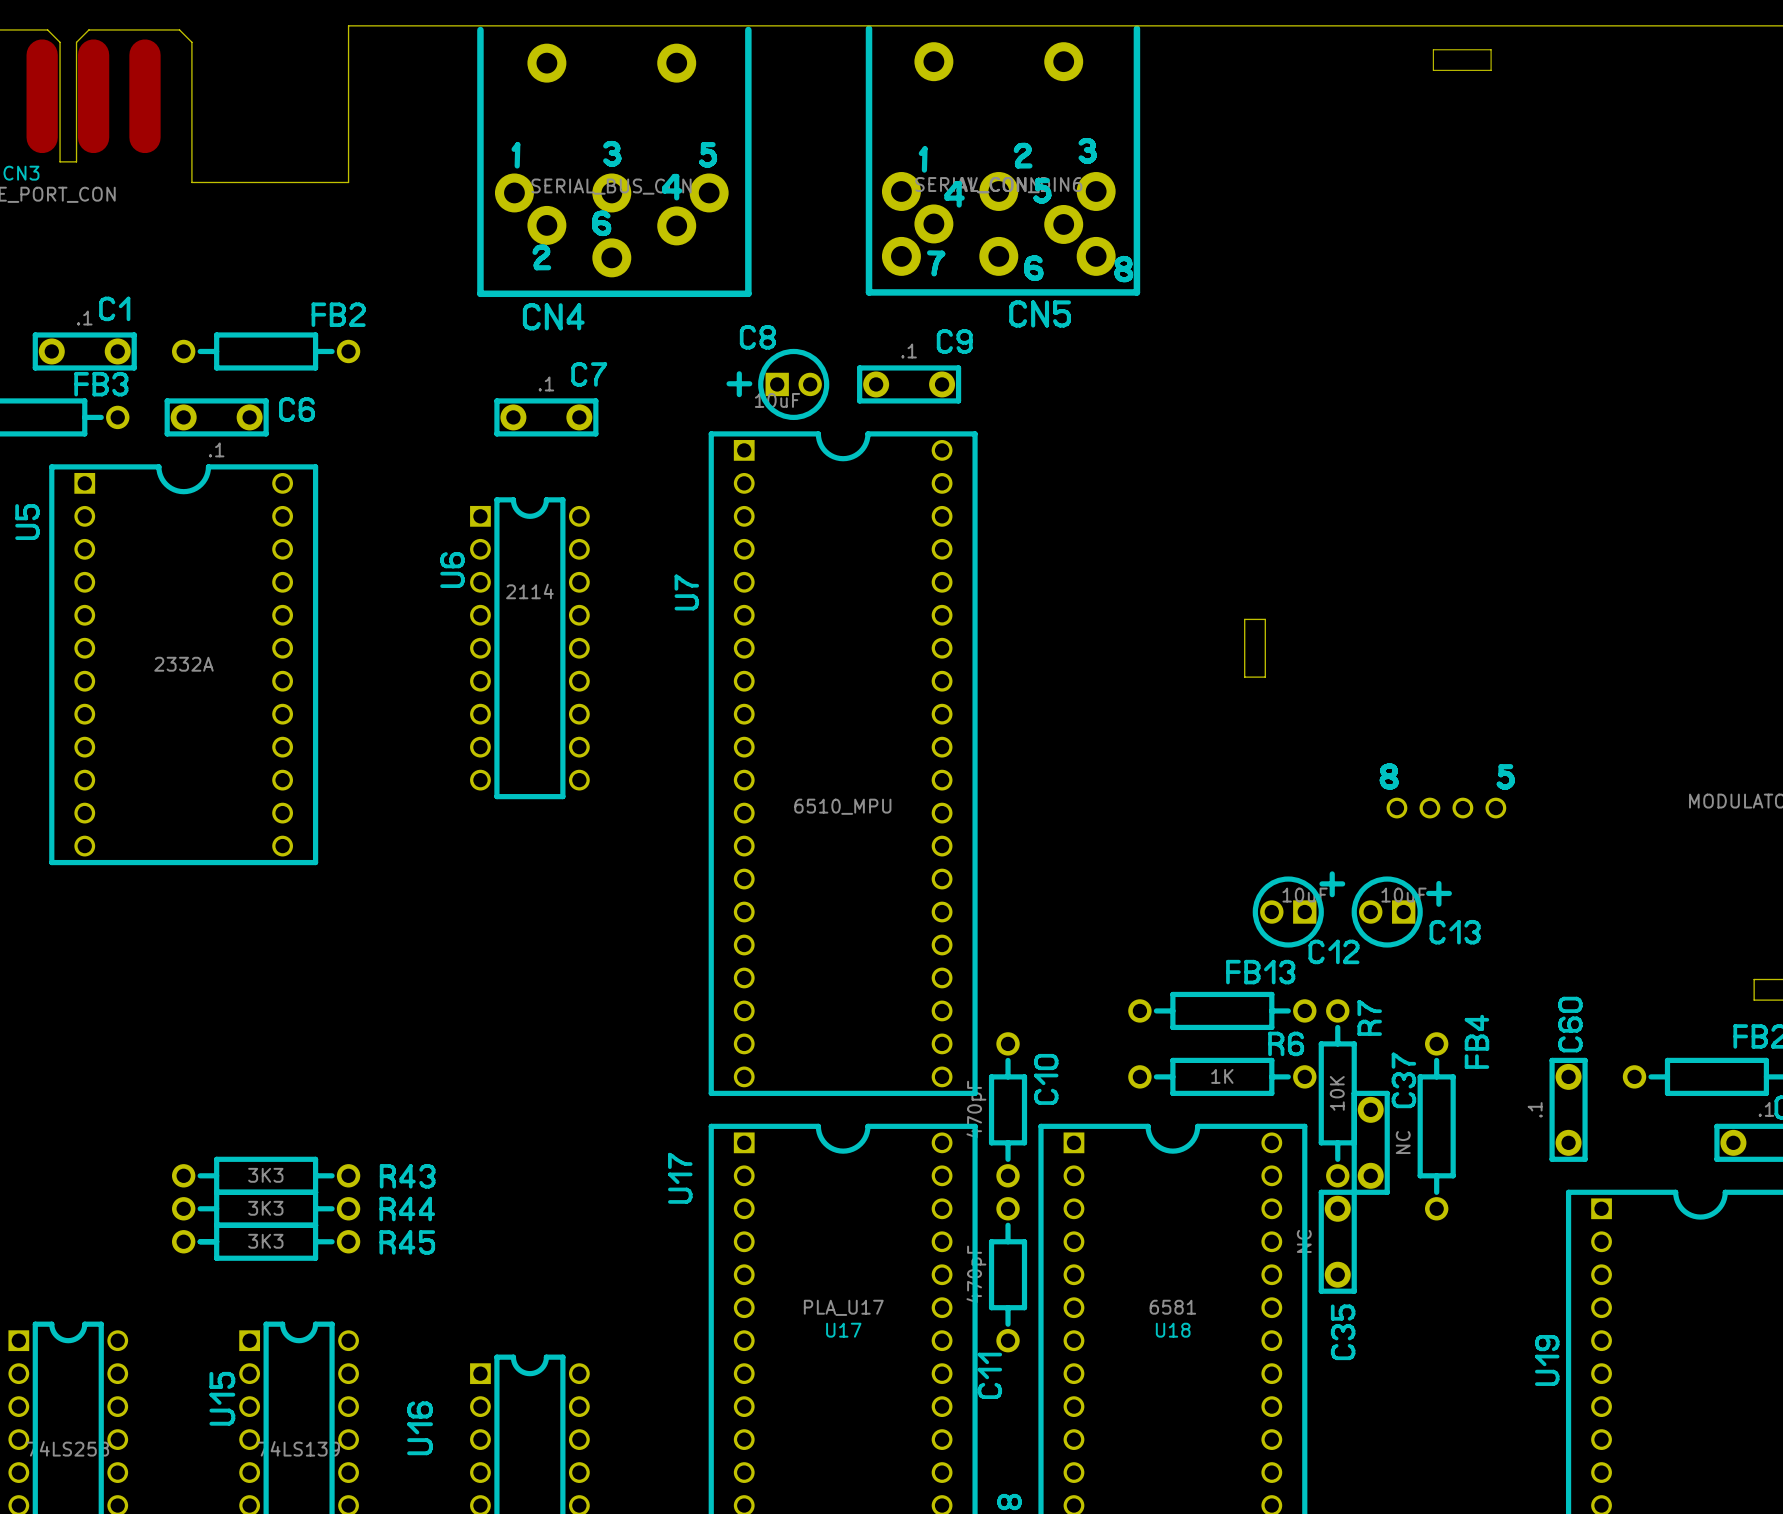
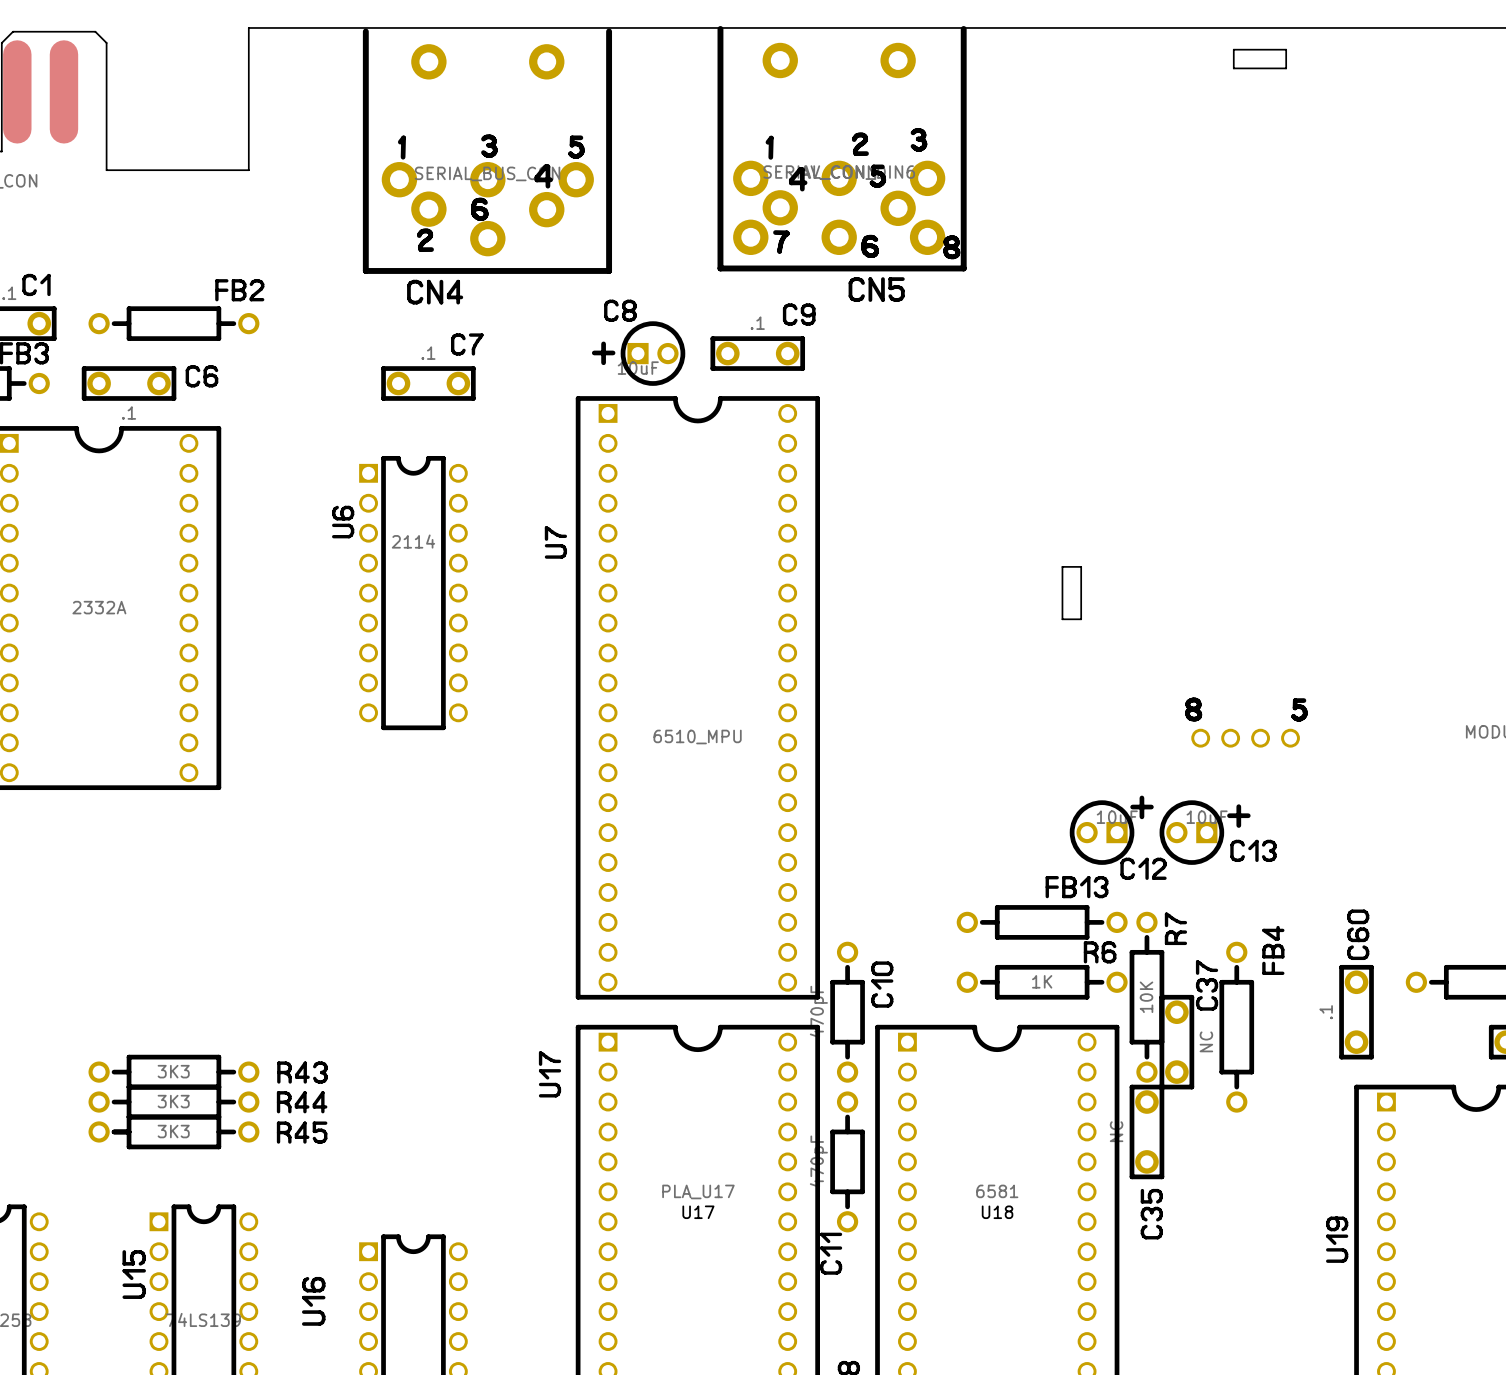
line: (869, 28) (869, 292) (1136, 292) (1136, 28) -> none
line: (480, 29) (480, 293) (748, 293) (748, 29) -> none
part footprint: [881, 42, 1116, 276] -> [717, 26, 967, 272]
part footprint: [494, 43, 729, 278] -> [362, 28, 613, 274]
line: (1081, 143) (1084, 140) (1091, 142) (1091, 149) (1086, 149) (1092, 151) (1094, 155) (1088, 161) (1081, 157) -> none
line: (713, 144) (703, 144) (703, 152) (707, 151) (712, 152) (713, 161) (707, 165) (701, 162) -> none
line: (605, 146) (609, 143) (616, 145) (616, 152) (611, 152) (616, 154) (618, 158) (613, 164) (605, 160) -> none
line: (514, 149) (517, 144) (517, 165) -> none
line: (1016, 150) (1019, 145) (1028, 147) (1028, 151) (1017, 163) (1018, 165) (1029, 165) -> none
line: (921, 153) (924, 148) (924, 170) -> none
line: (1047, 180) (1037, 180) (1037, 188) (1041, 187) (1046, 188) (1048, 197) (1041, 201) (1036, 198) -> none
line: (679, 190) (664, 191) (664, 188) (674, 176) (676, 176) (676, 197) -> none
line: (962, 198) (947, 198) (947, 195) (956, 183) (959, 183) (959, 205) -> none
line: (607, 215) (603, 213) (597, 214) (594, 220) (596, 230) (600, 233) (607, 232) (607, 224) (602, 222) (596, 223) -> none
line: (535, 252) (538, 247) (547, 249) (547, 253) (536, 264) (536, 267) (548, 267) -> none
line: (929, 252) (942, 253) (936, 262) (934, 273) -> none
line: (1123, 258) (1118, 260) (1117, 264) (1120, 267) (1122, 268) (1124, 269) (1126, 269) (1128, 271) (1130, 274) (1129, 277) (1123, 279) (1119, 278) (1116, 272) (1118, 270) (1119, 269) (1121, 269) (1123, 268) (1126, 267) (1129, 265) (1128, 260) (1124, 258) -> none
line: (1040, 260) (1036, 258) (1029, 259) (1026, 265) (1028, 274) (1033, 278) (1039, 277) (1039, 269) (1034, 267) (1028, 268) -> none

